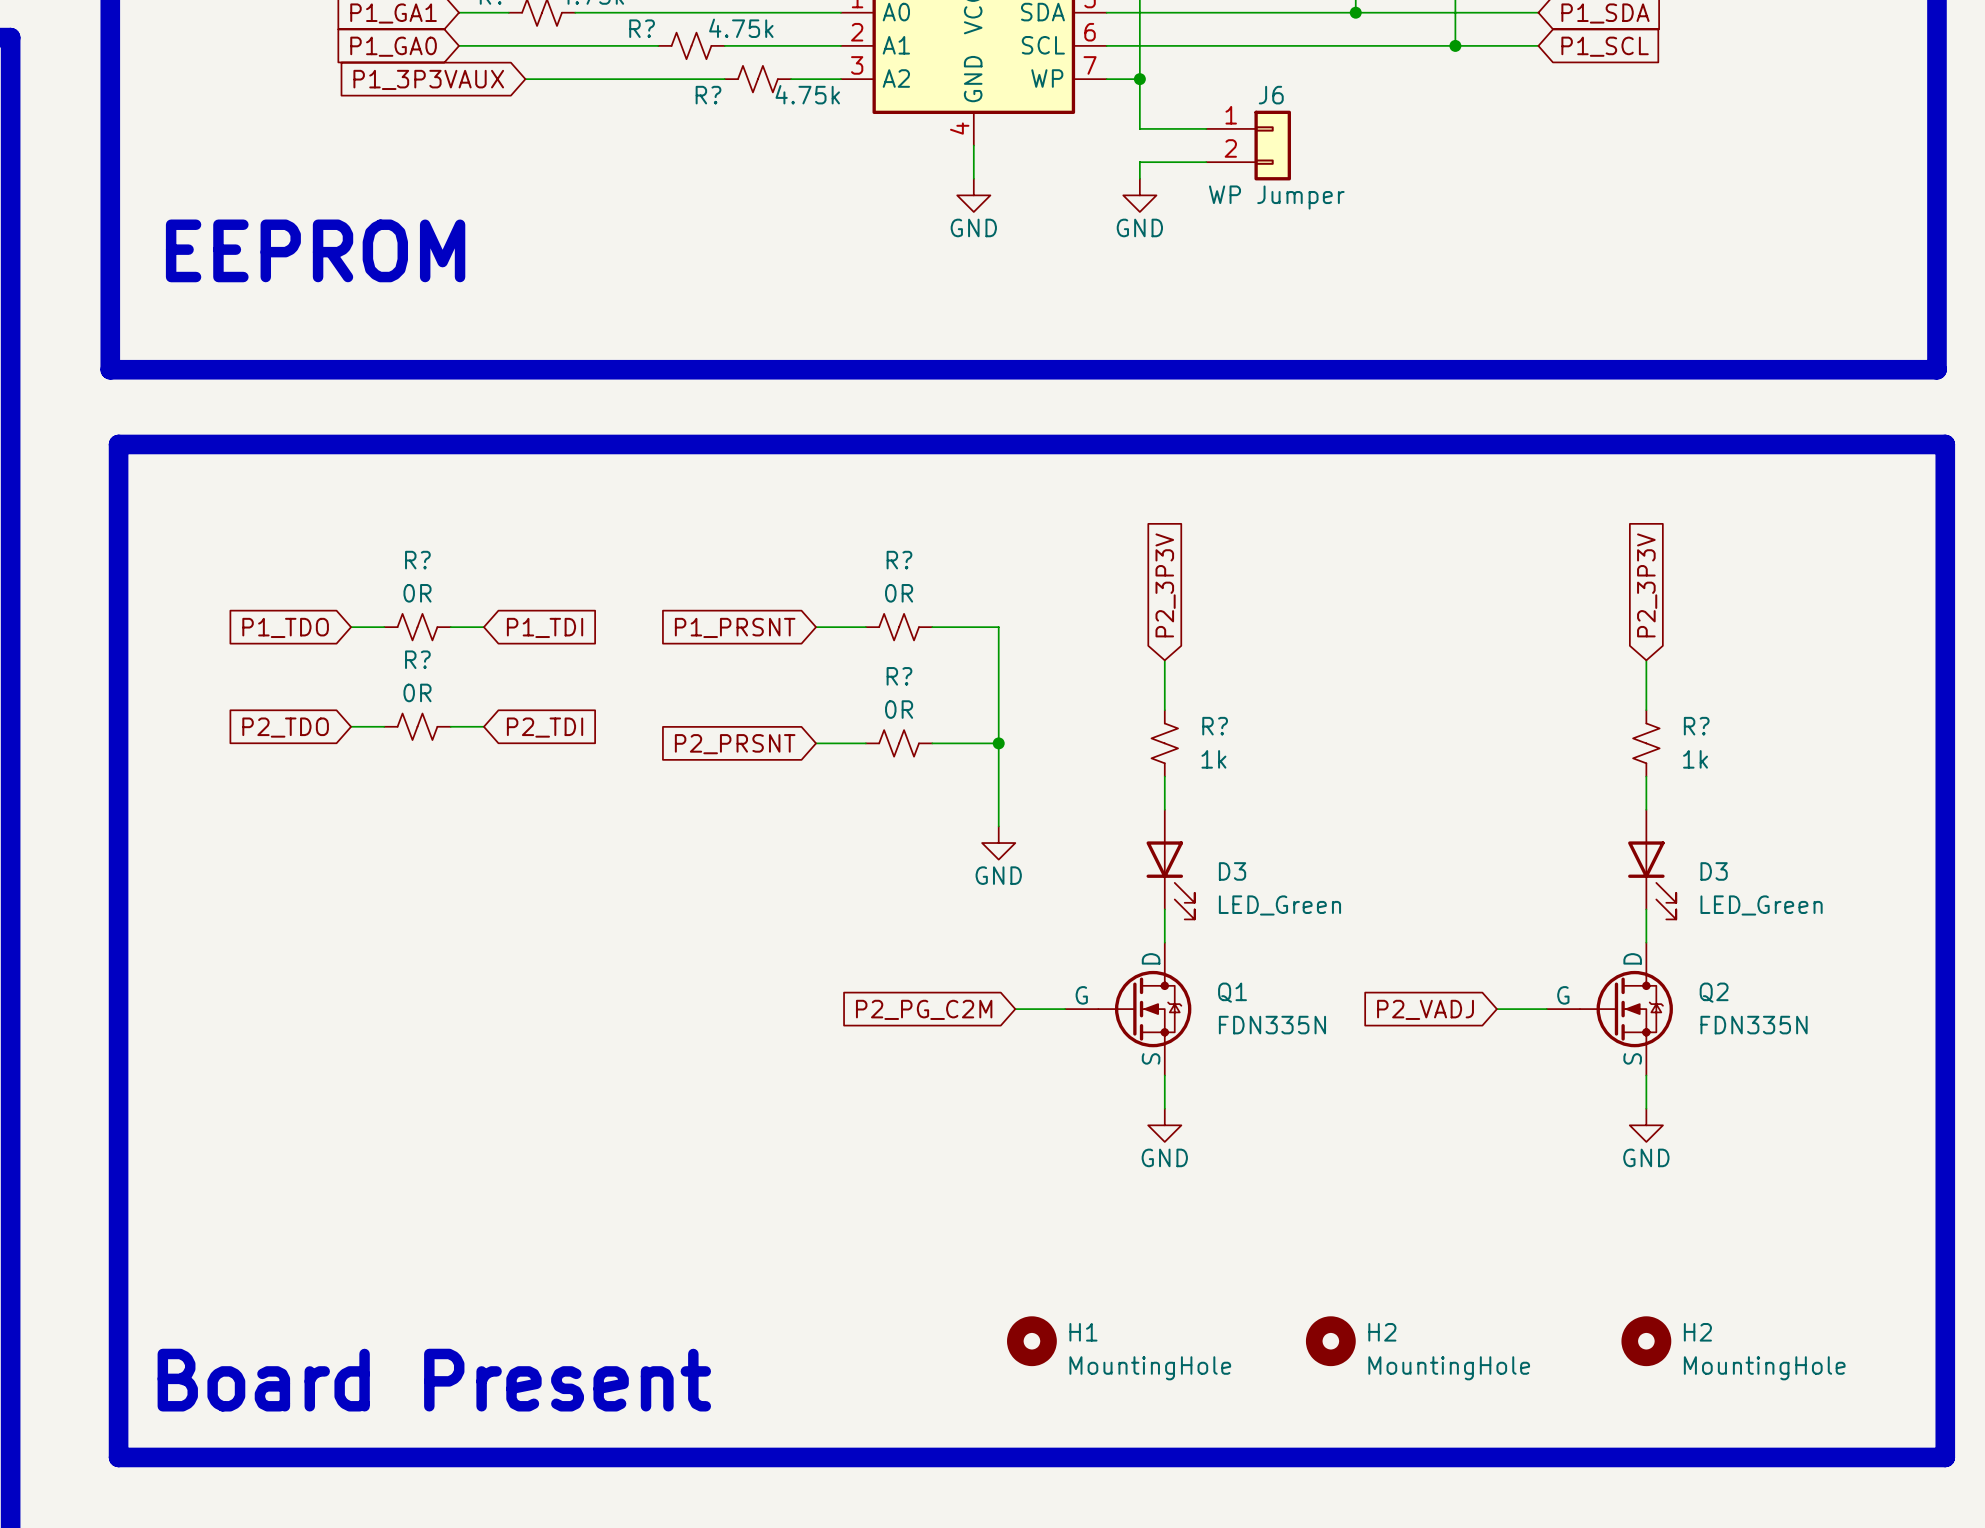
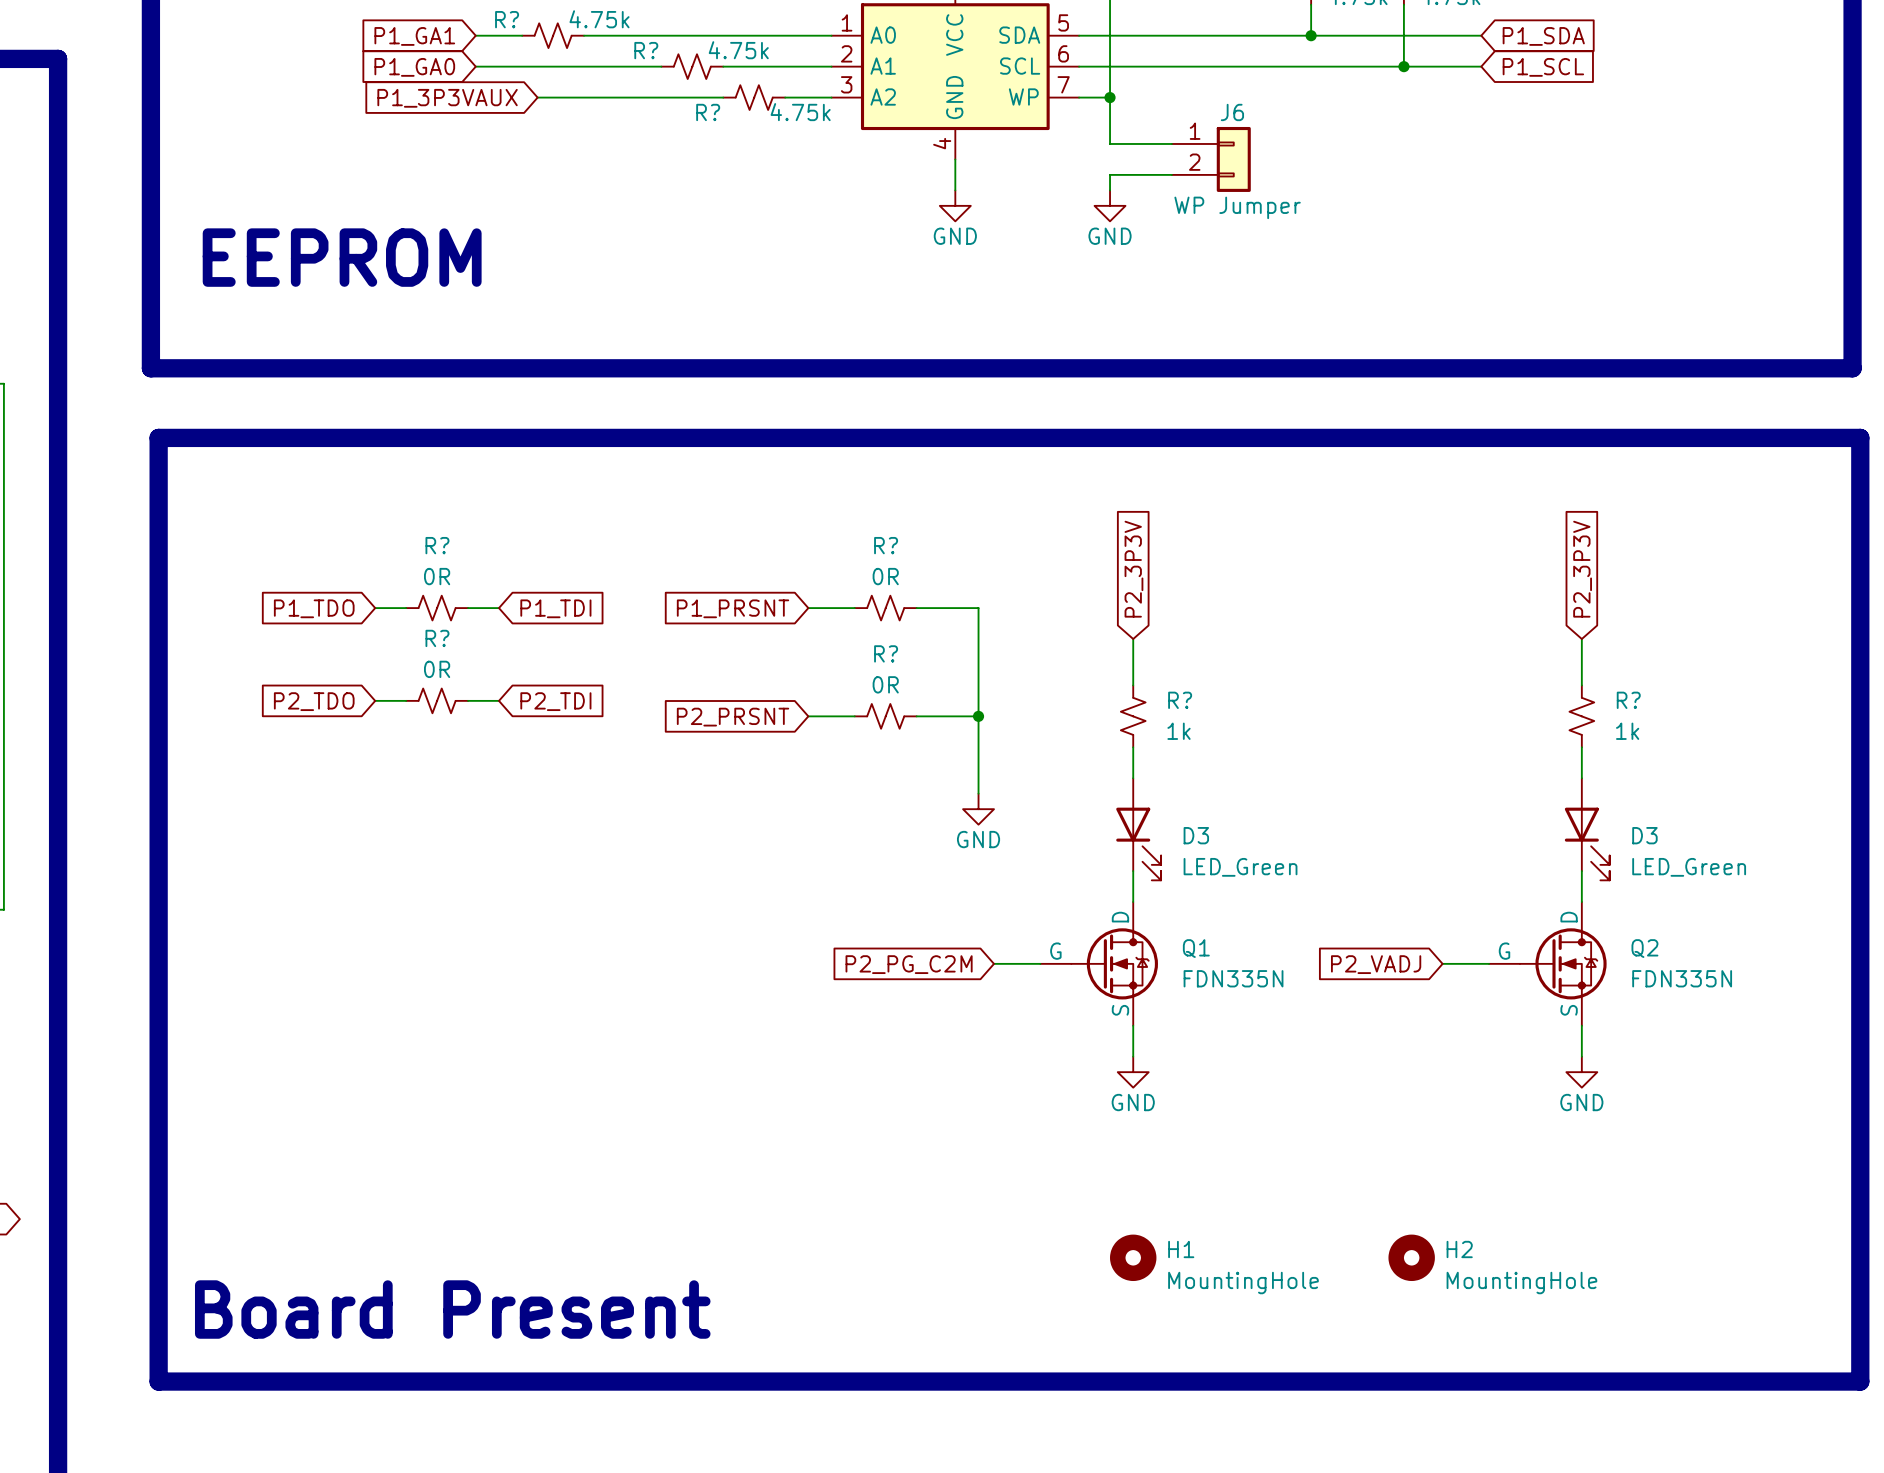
H2: none -> MountingHole (1411, 1257)
H1 position: (1031, 1341) -> (1133, 1257)
H2: MountingHole (1330, 1341) -> none
H2: MountingHole (1646, 1341) -> none

